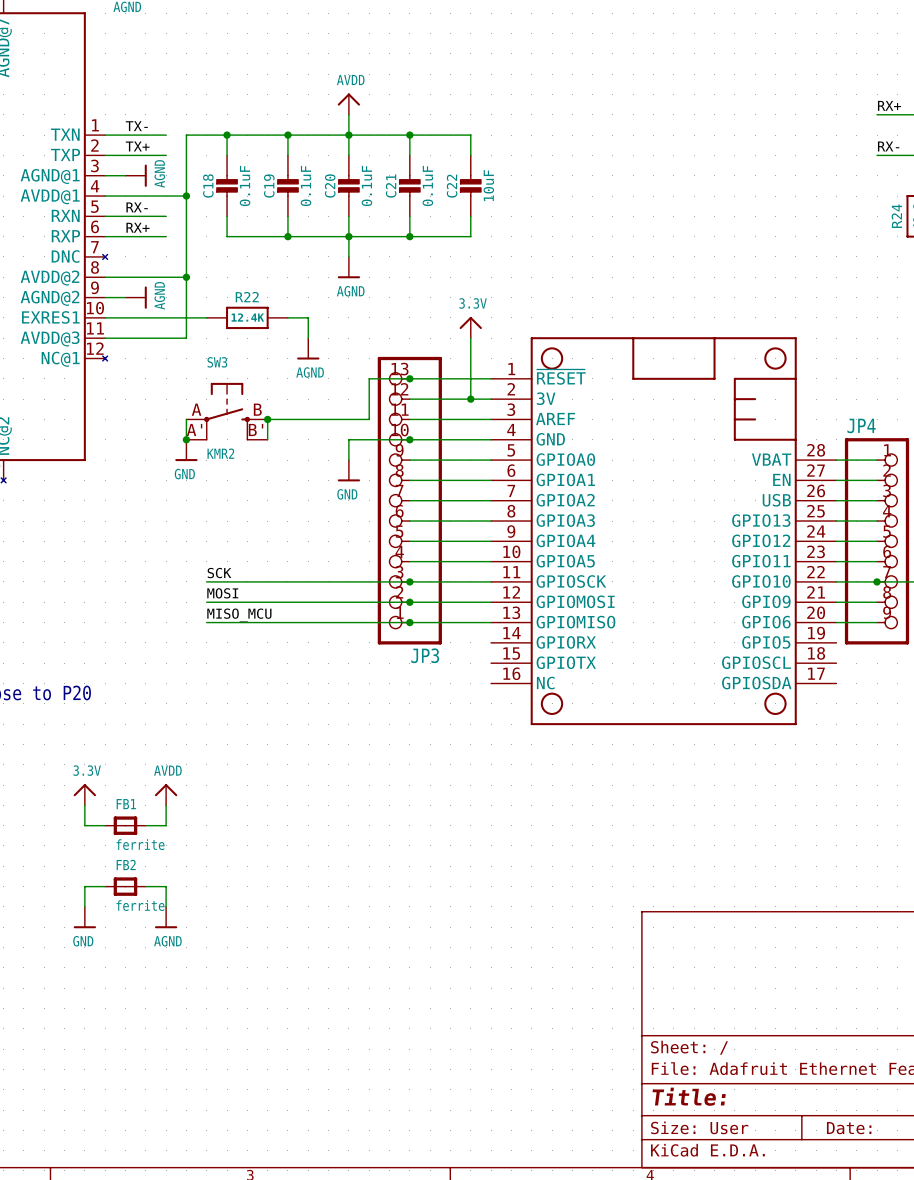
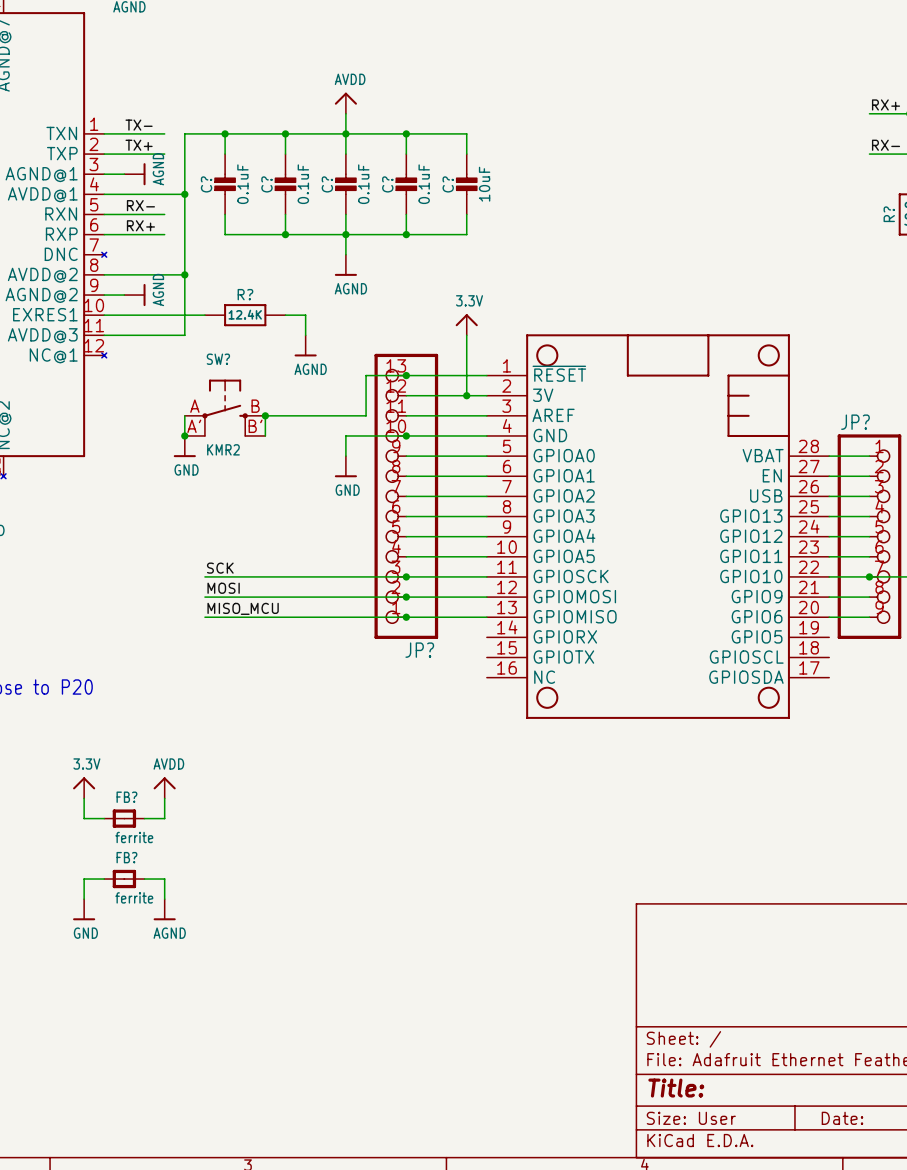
C18 name: C18 (208, 185) -> C? (206, 184)
C19 name: C19 (269, 186) -> C? (266, 184)
C20 name: C20 (330, 186) -> C? (327, 184)
C21 name: C21 (391, 186) -> C? (387, 184)
C22 name: C22 (452, 186) -> C? (448, 184)
R24 name: R24 (896, 216) -> R? (889, 214)
R22 name: R22 (247, 297) -> R? (245, 294)
SW3 name: SW3 (217, 362) -> SW? (218, 359)
JP4 name: JP4 (861, 425) -> JP? (855, 422)
JP3 name: JP3 (425, 655) -> JP? (419, 650)
FB1 name: FB1 (126, 804) -> FB? (126, 797)
FB2 name: FB2 (126, 864) -> FB? (126, 857)

